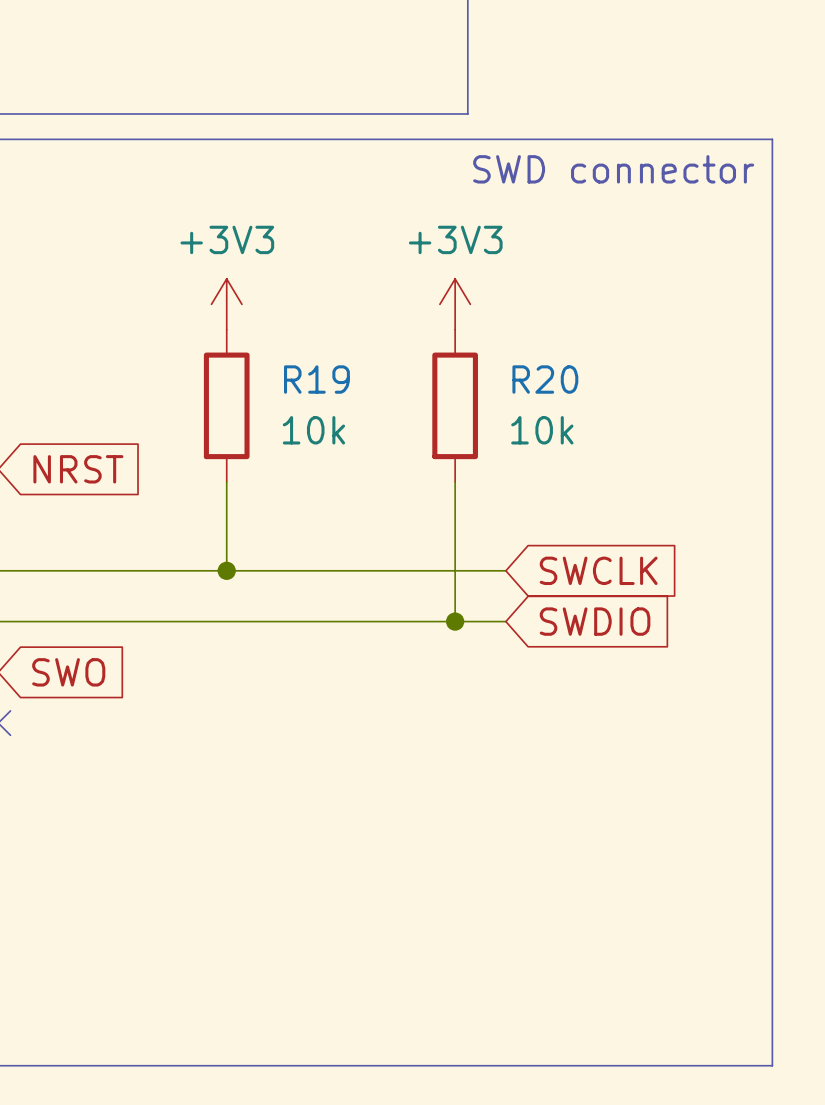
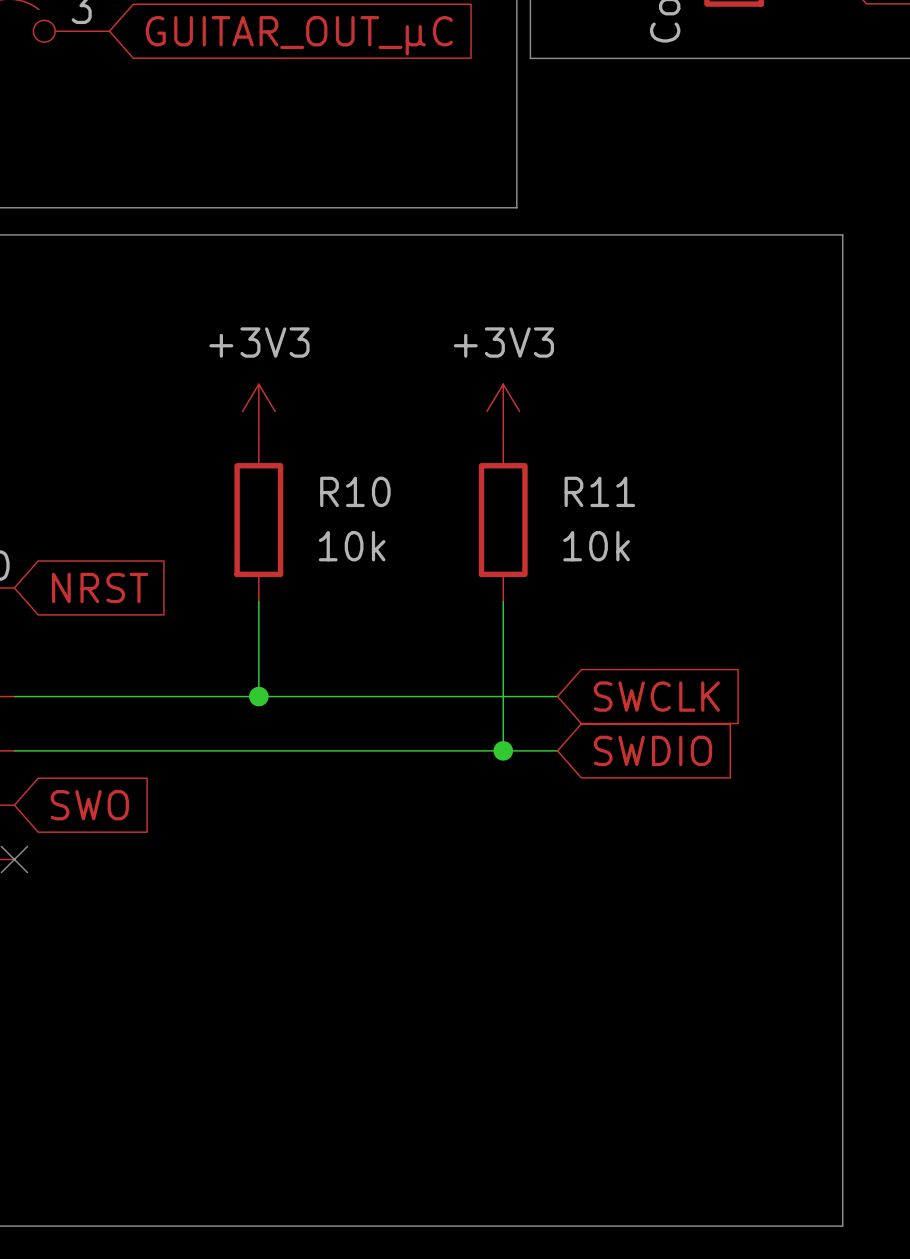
text: SWD connector (613, 169) -> none
R19 name: R19 (316, 379) -> R10 (355, 491)
R20 name: R20 (545, 379) -> R11 (599, 491)

